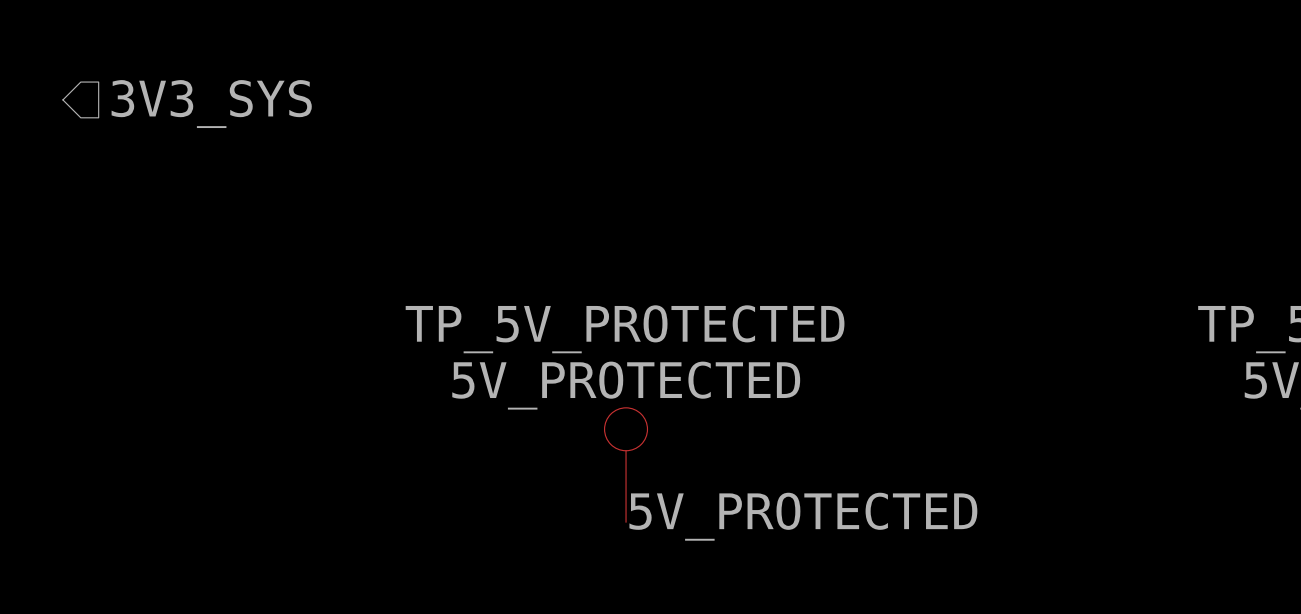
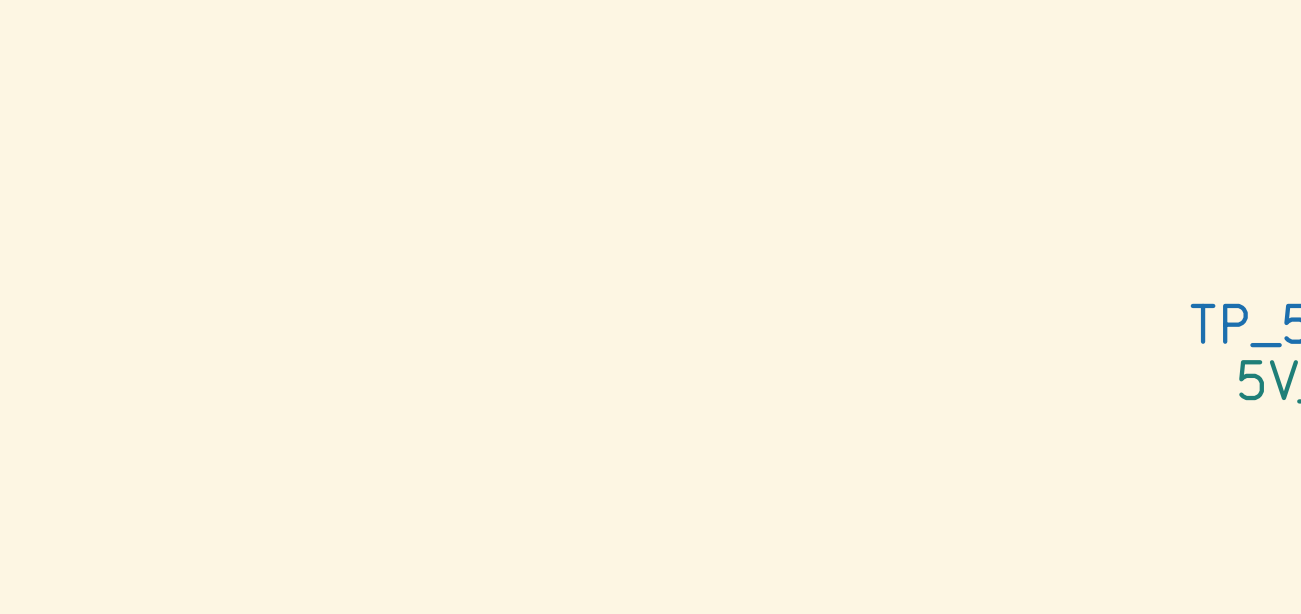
hierarchical label: 3V3_SYS (211, 104) -> none
TP_5V_PROTECTED: 5V_PROTECTED (626, 465) -> none
label: 5V_PROTECTED (803, 516) -> none

